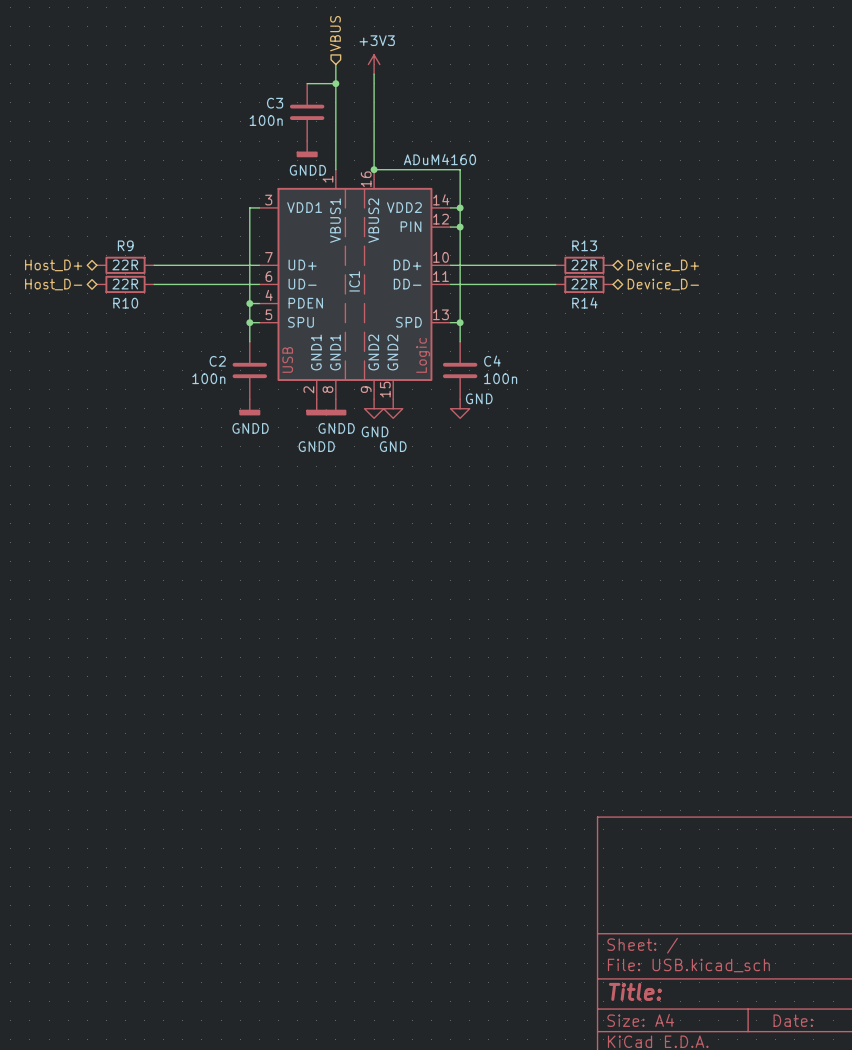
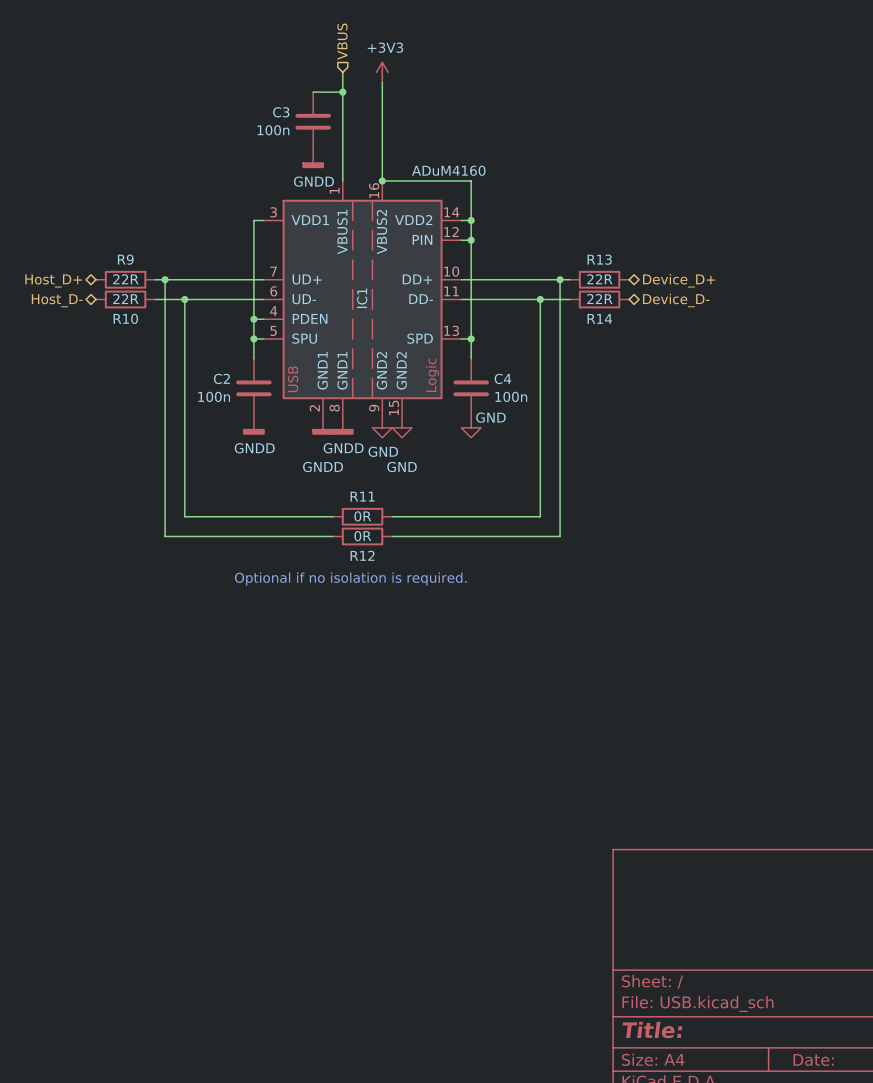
wire: none -> (165, 279) (165, 536) (332, 536)
junction: none -> (165, 279)
wire: none -> (560, 279) (560, 536) (392, 536)
junction: none -> (560, 279)
wire: none -> (184, 299) (184, 516) (332, 516)
junction: none -> (184, 299)
wire: none -> (540, 299) (540, 516) (392, 516)
junction: none -> (540, 299)
R11: none -> 0R (362, 516)
R12: none -> 0R (362, 536)
text: none -> Optional if no isolation is required. (350, 578)

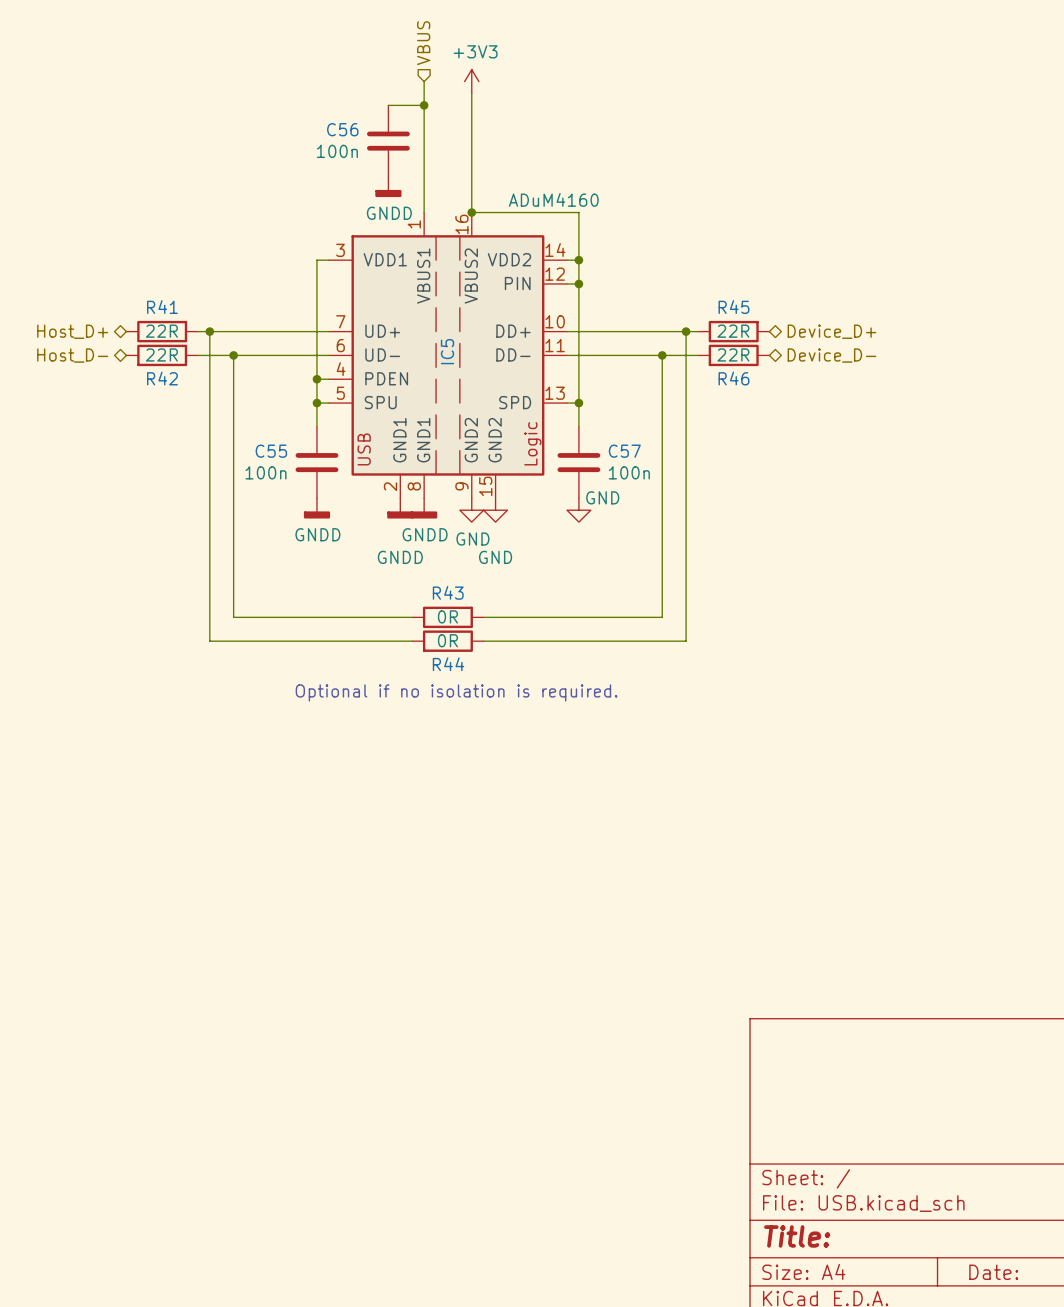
C3 name: C3 (281, 112) -> C56 (342, 129)
R9 name: R9 (125, 259) -> R41 (162, 307)
R13 name: R13 (599, 259) -> R45 (733, 307)
IC1 name: IC1 (362, 298) -> IC5 (447, 351)
R10 name: R10 (125, 318) -> R42 (162, 378)
R14 name: R14 (599, 318) -> R46 (733, 378)
C2 name: C2 (221, 378) -> C55 (271, 451)
C4 name: C4 (502, 378) -> C57 (624, 451)
R11 name: R11 (362, 496) -> R43 (448, 592)
R12 name: R12 (362, 555) -> R44 (448, 664)

